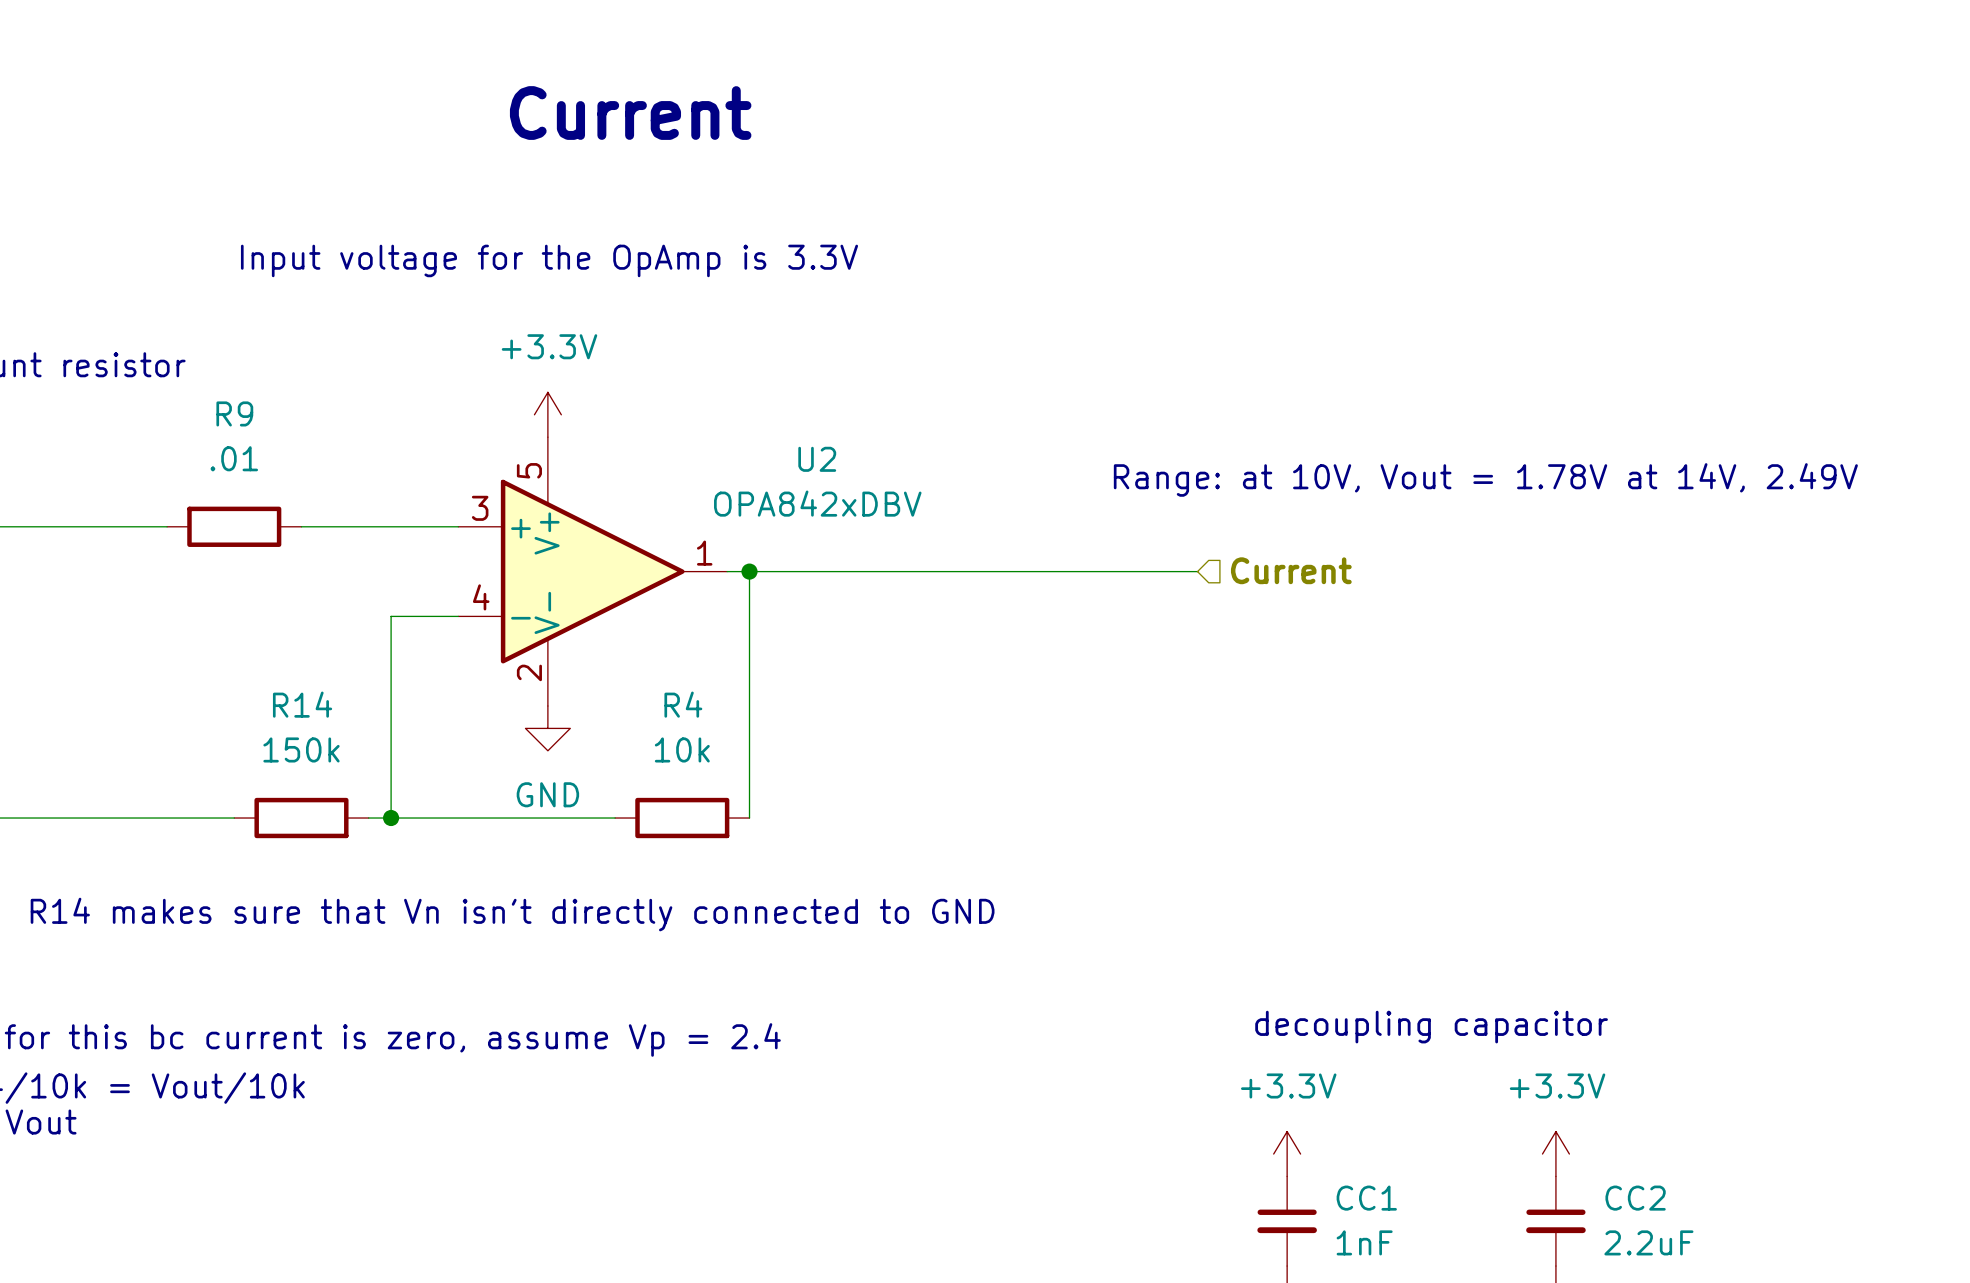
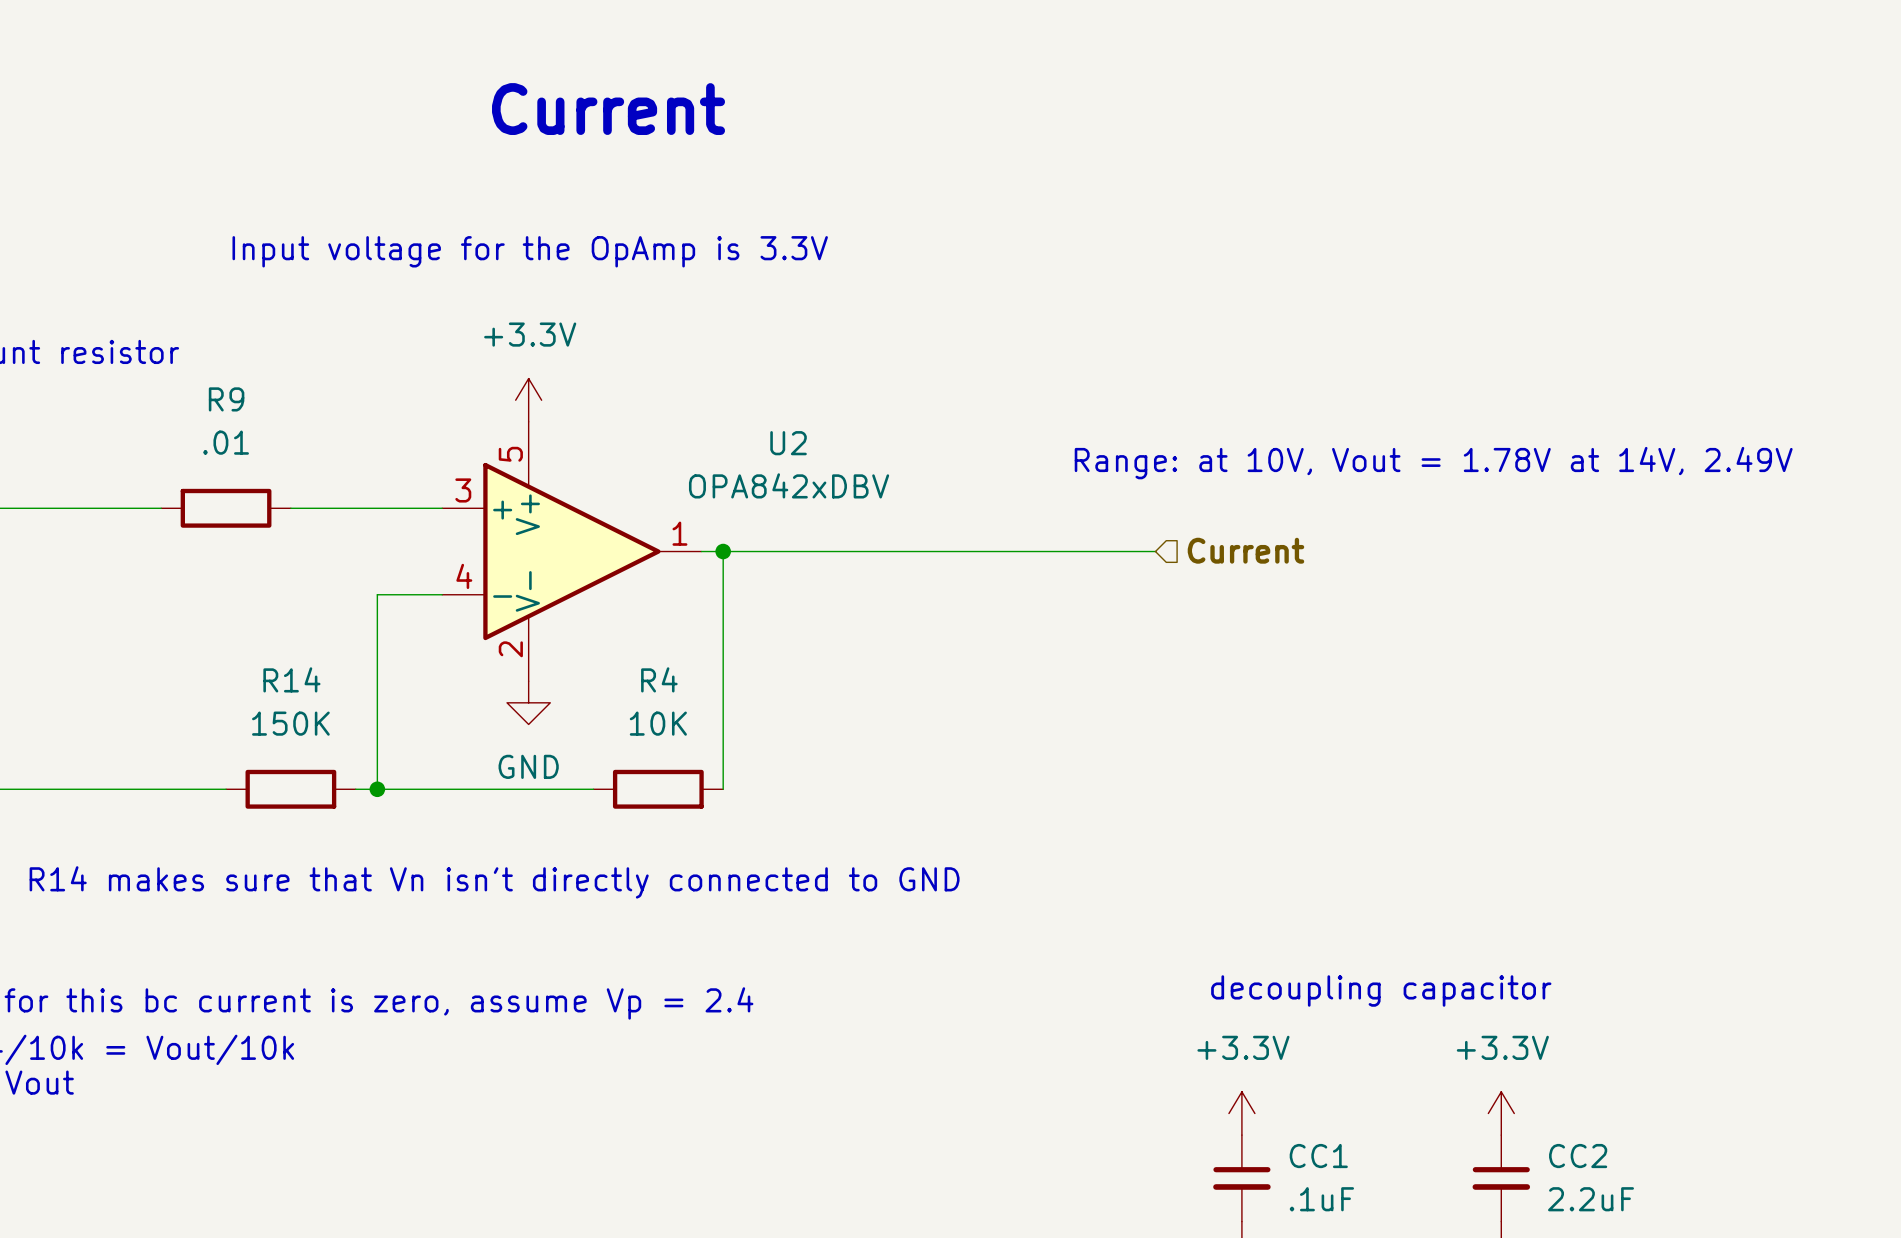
R14 value: 150k (301, 749) -> 150K (290, 723)
R4 value: 10k (682, 749) -> 10K (658, 723)
CC1 value: 1nF (1364, 1242) -> .1uF (1321, 1199)

